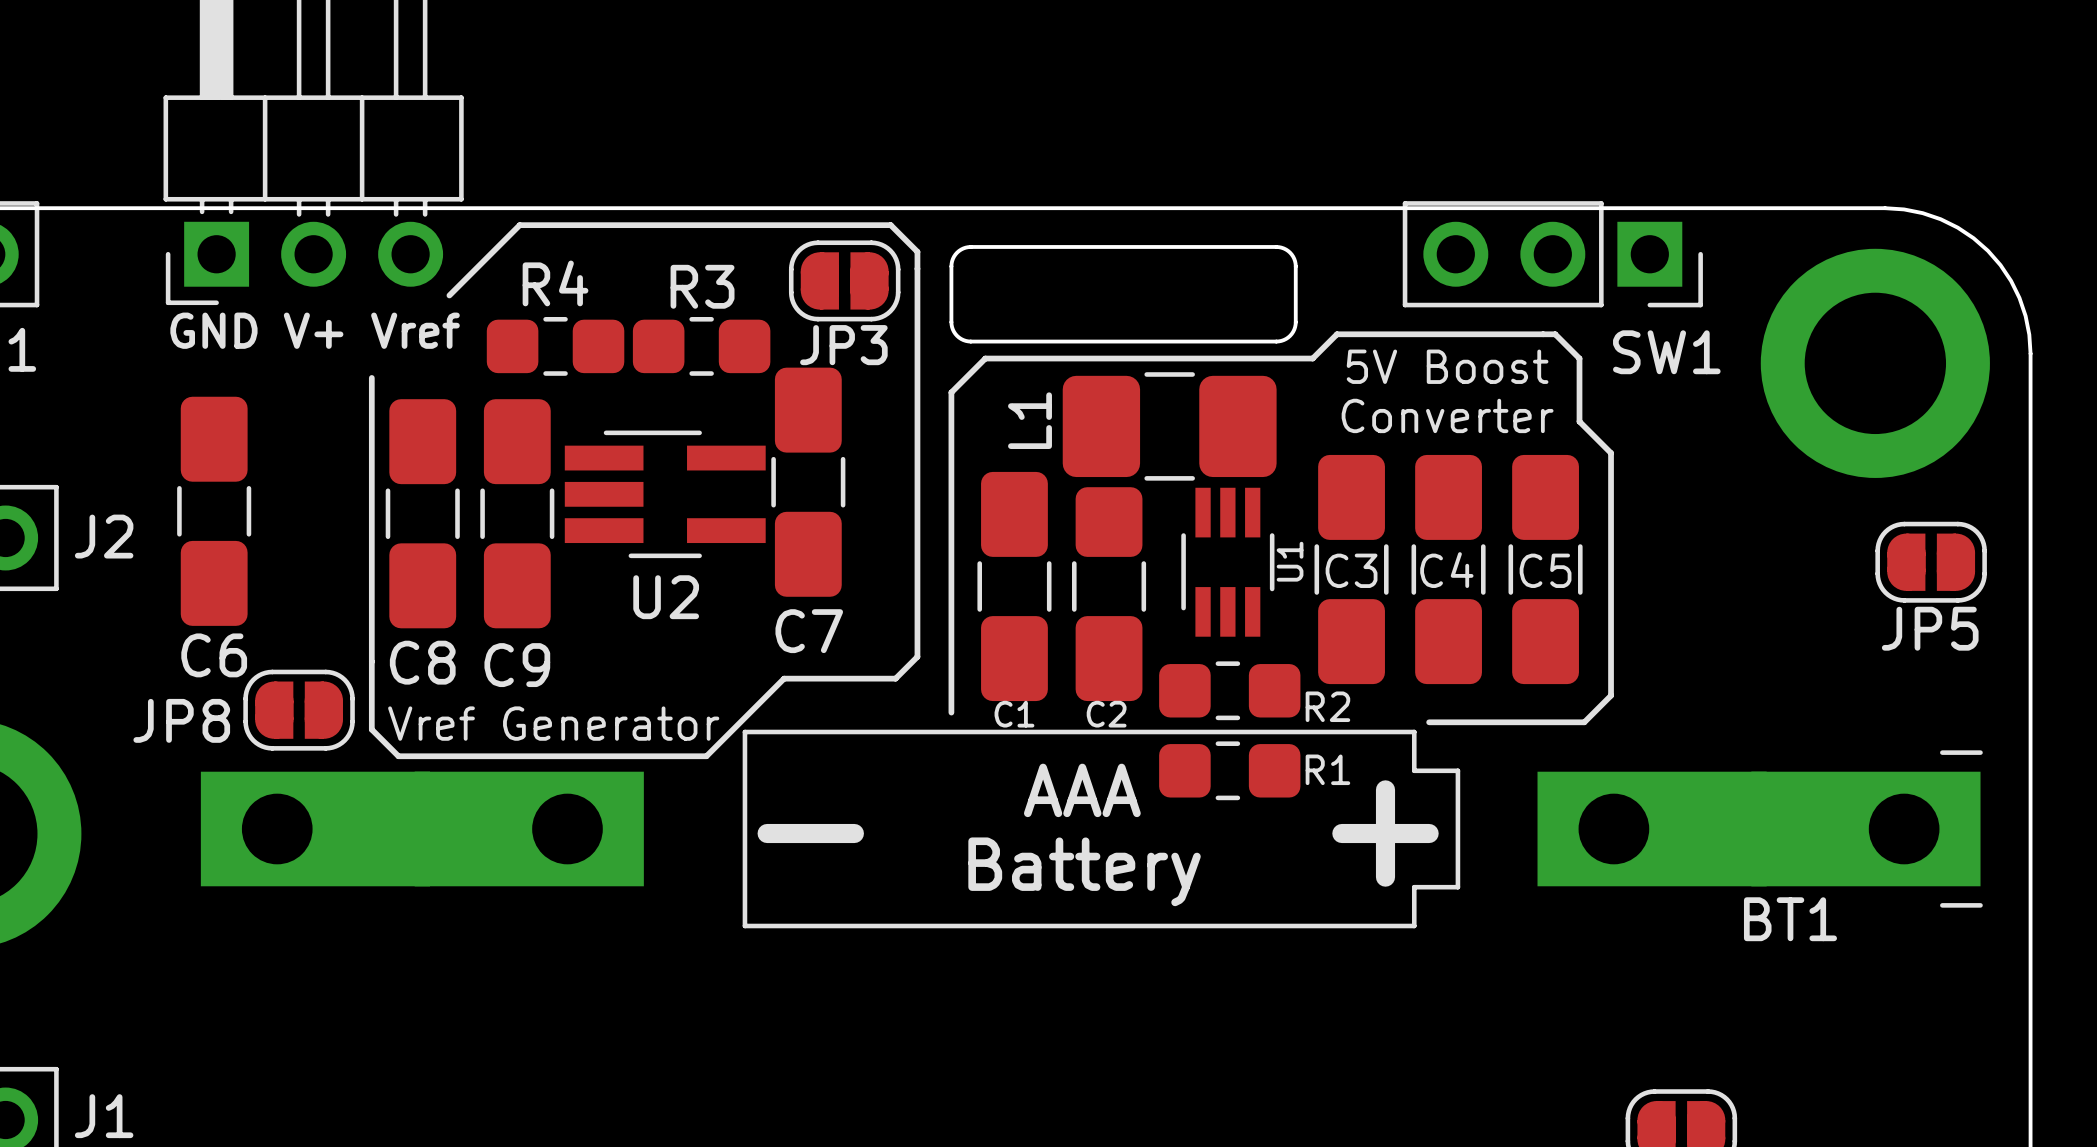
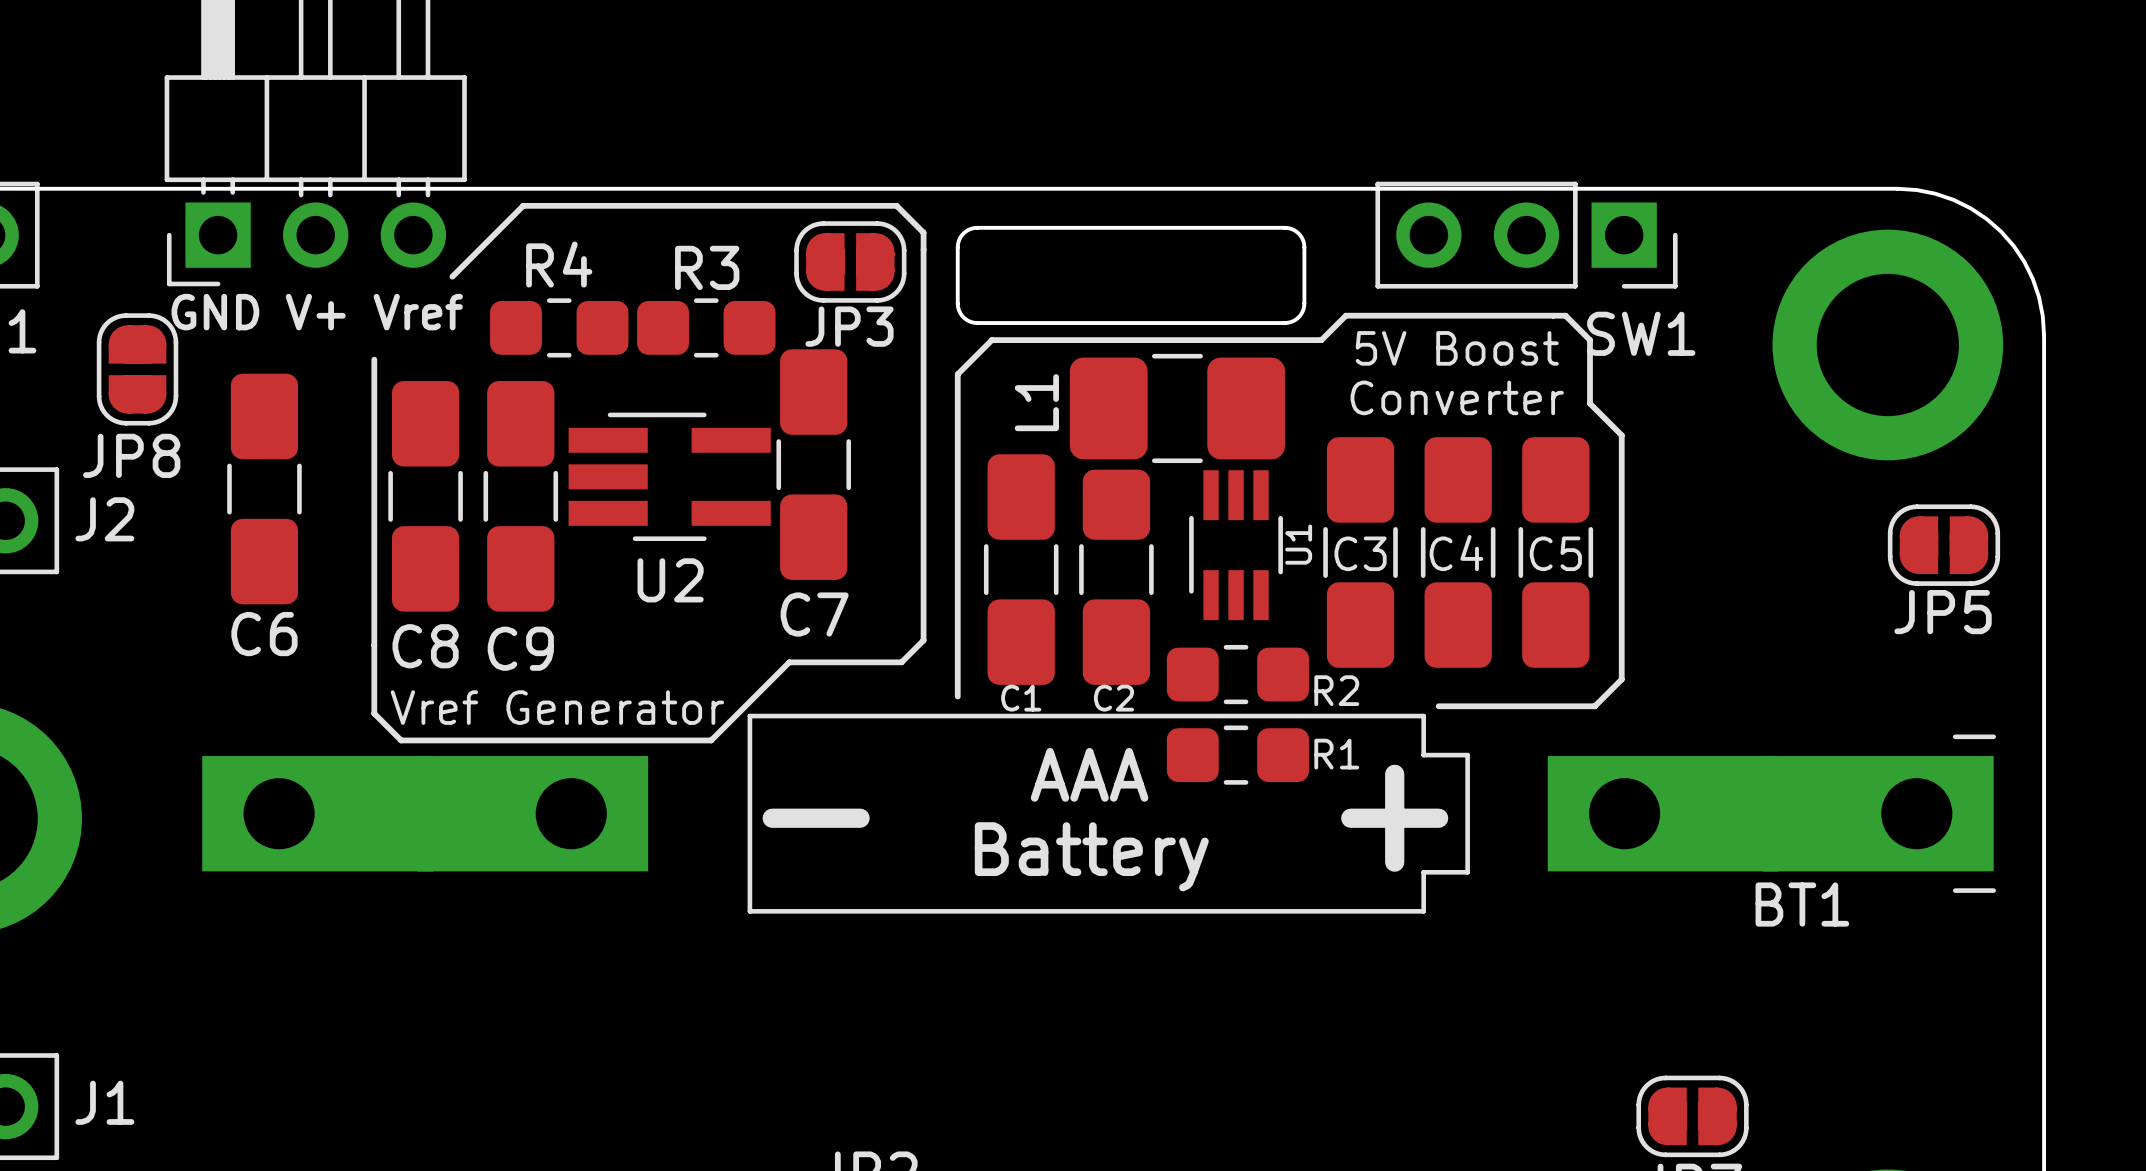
SW1 position: (1552, 254) -> (1526, 235)
C6 position: (214, 511) -> (264, 489)
JP8 rotation: 0° (299, 710) -> 90° clockwise (137, 369)
JP8 position: (299, 710) -> (137, 369)
JP8 name position: JP8 (181, 720) -> JP8 (131, 455)

